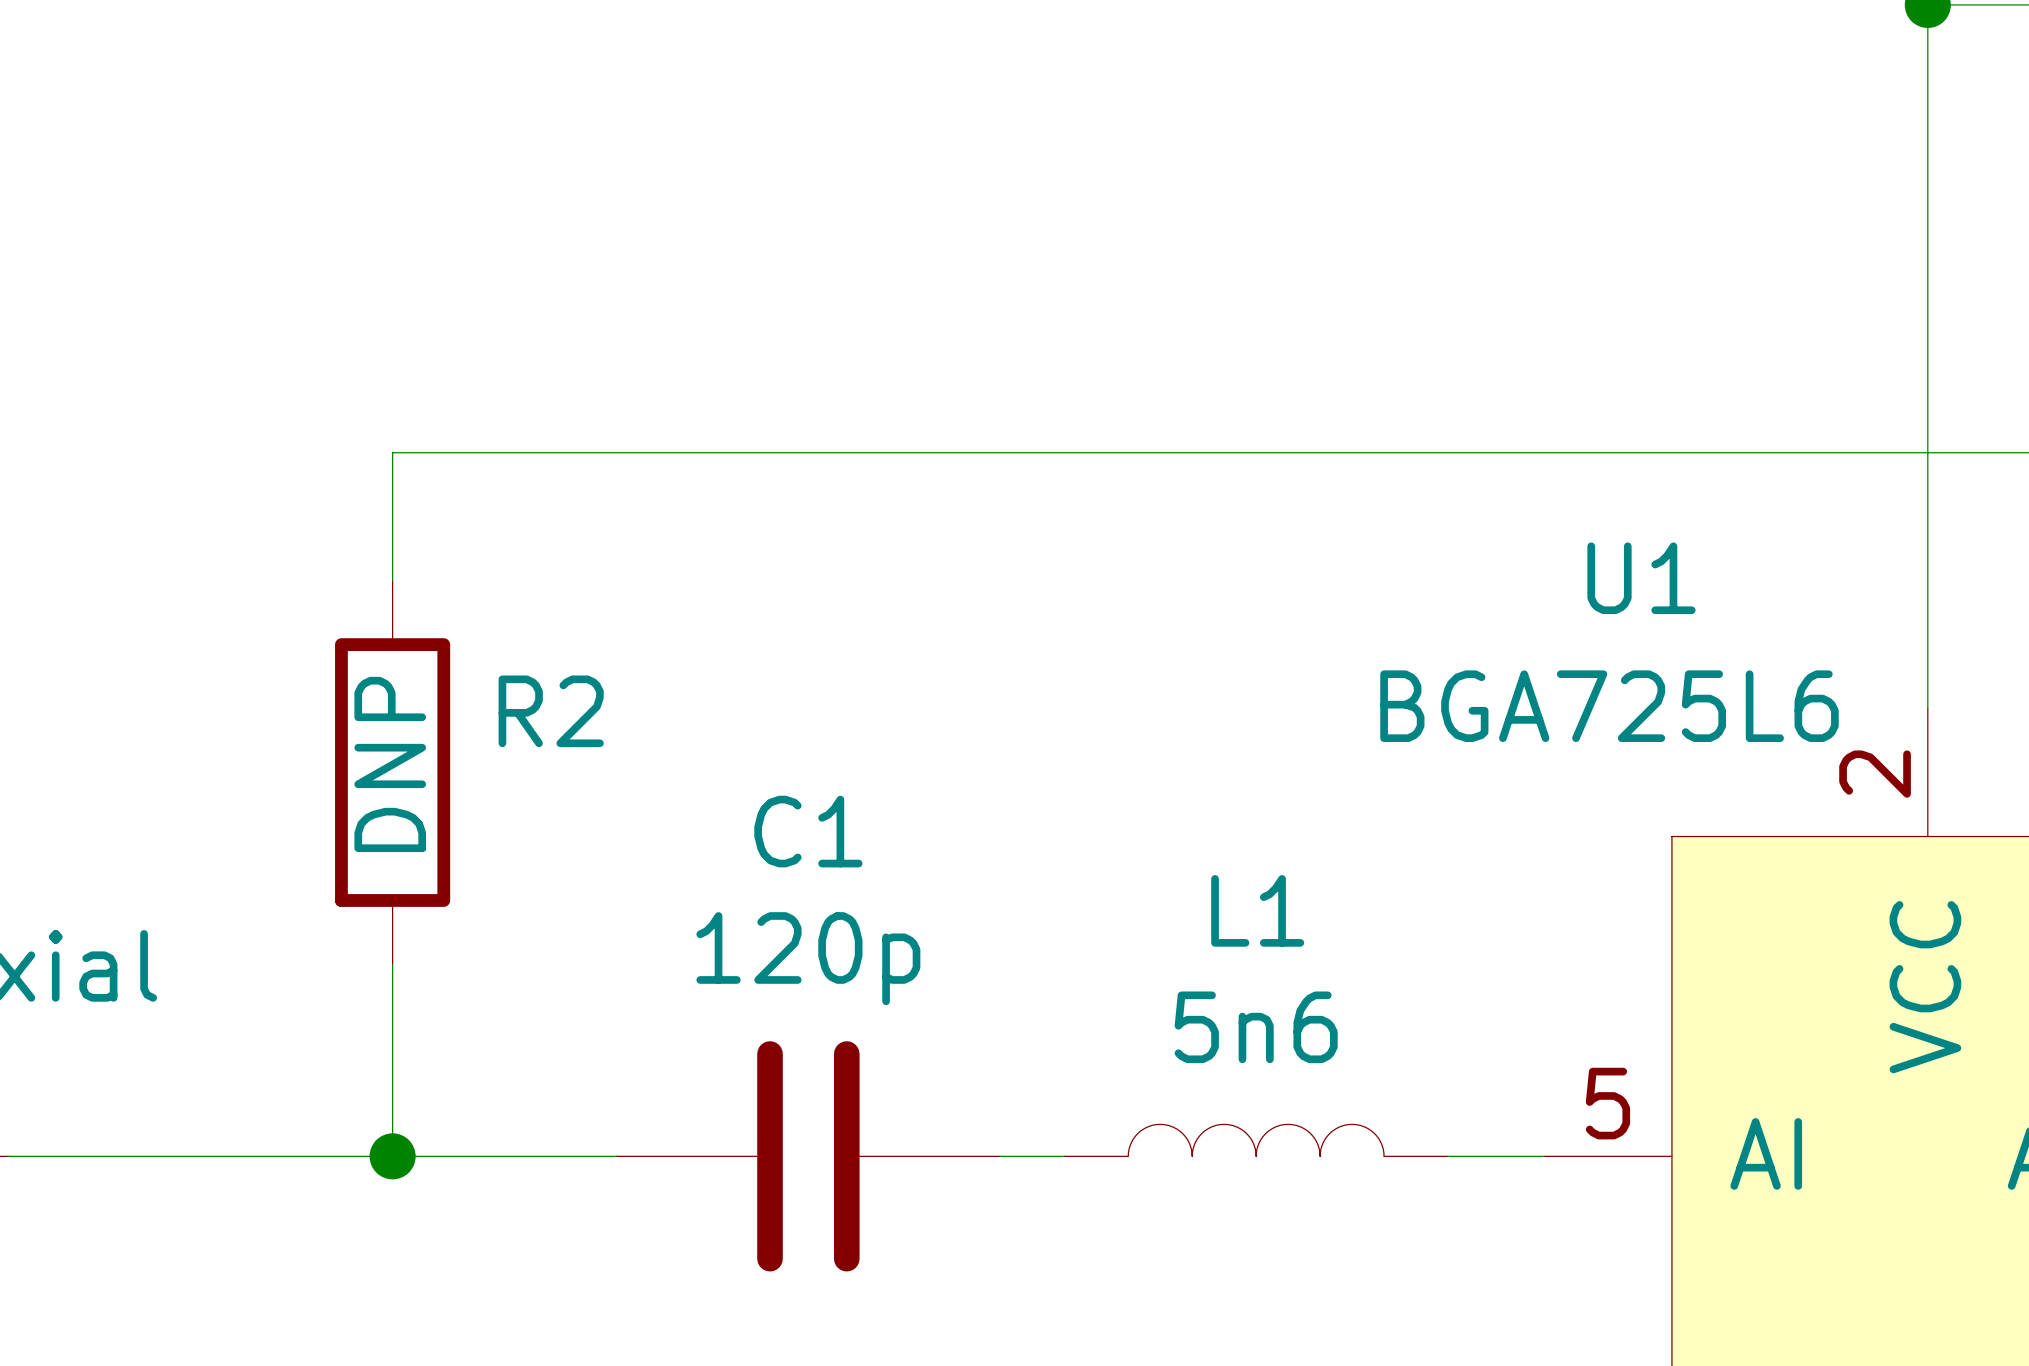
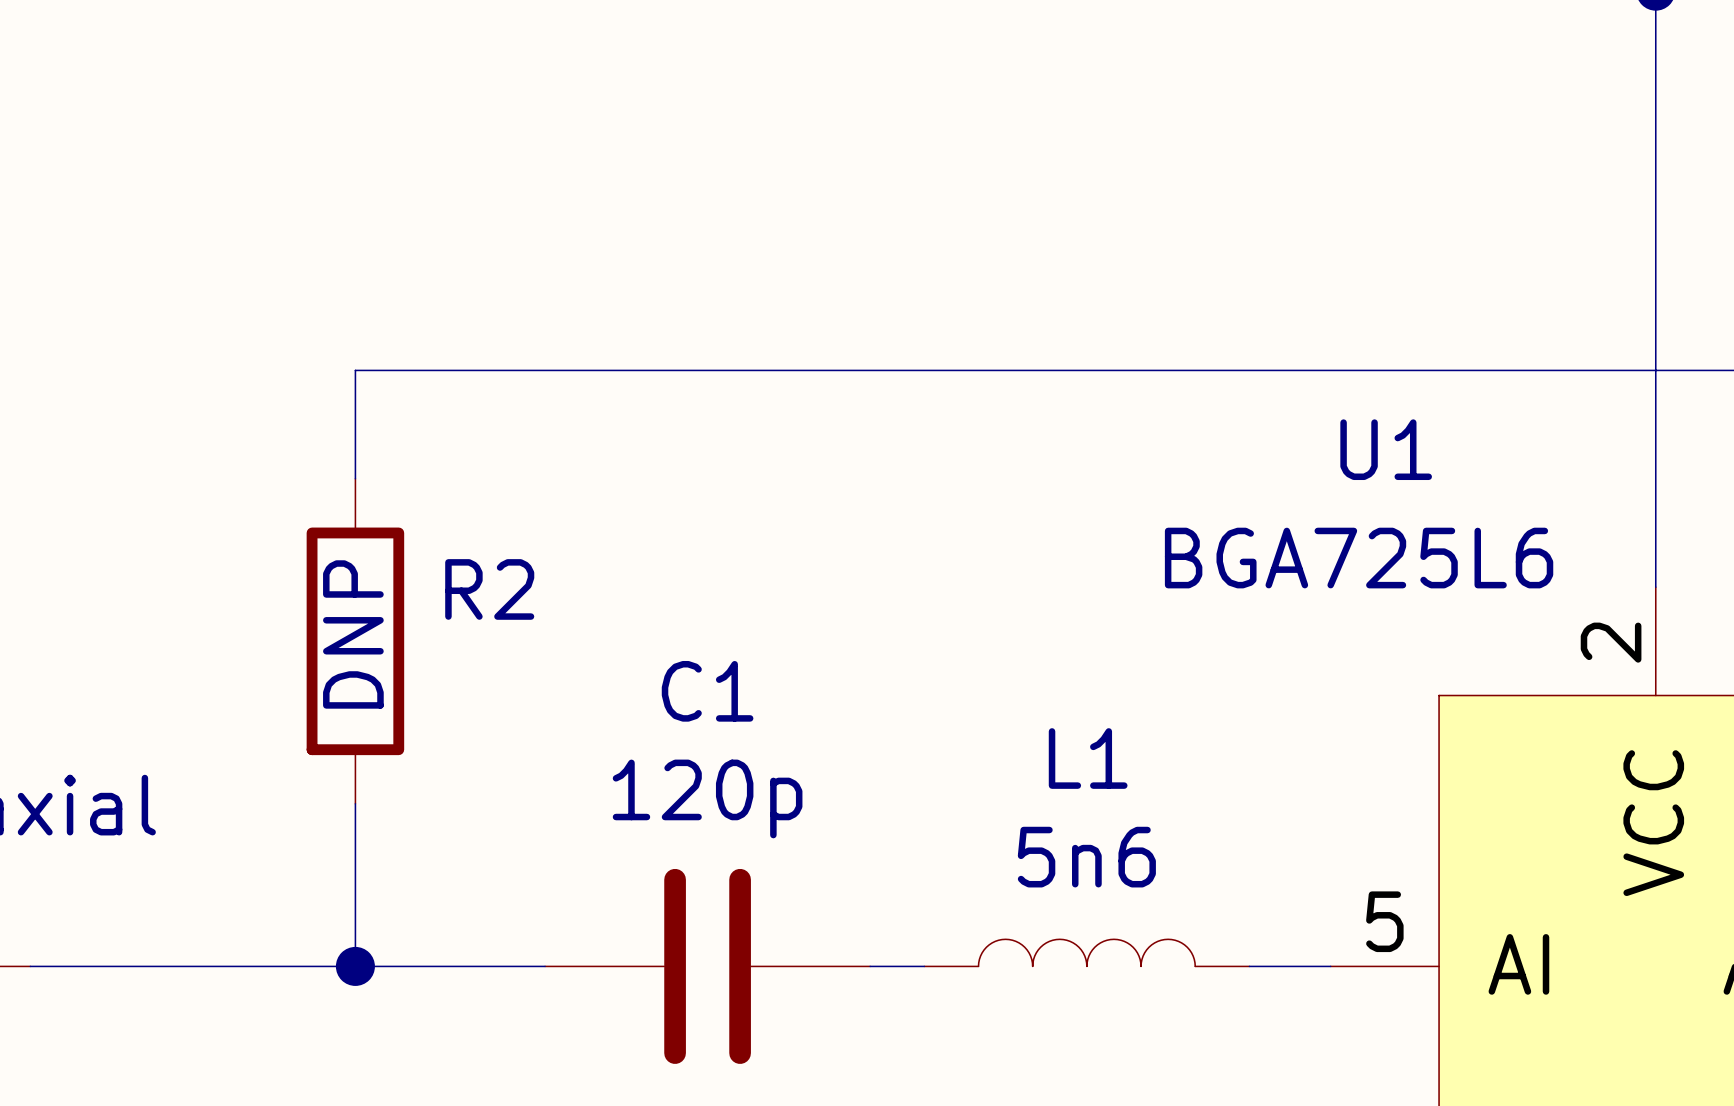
U1 name position: U1 (1641, 578) -> U1 (1386, 449)
U1 value position: BGA725L6 (1609, 706) -> BGA725L6 (1359, 558)

